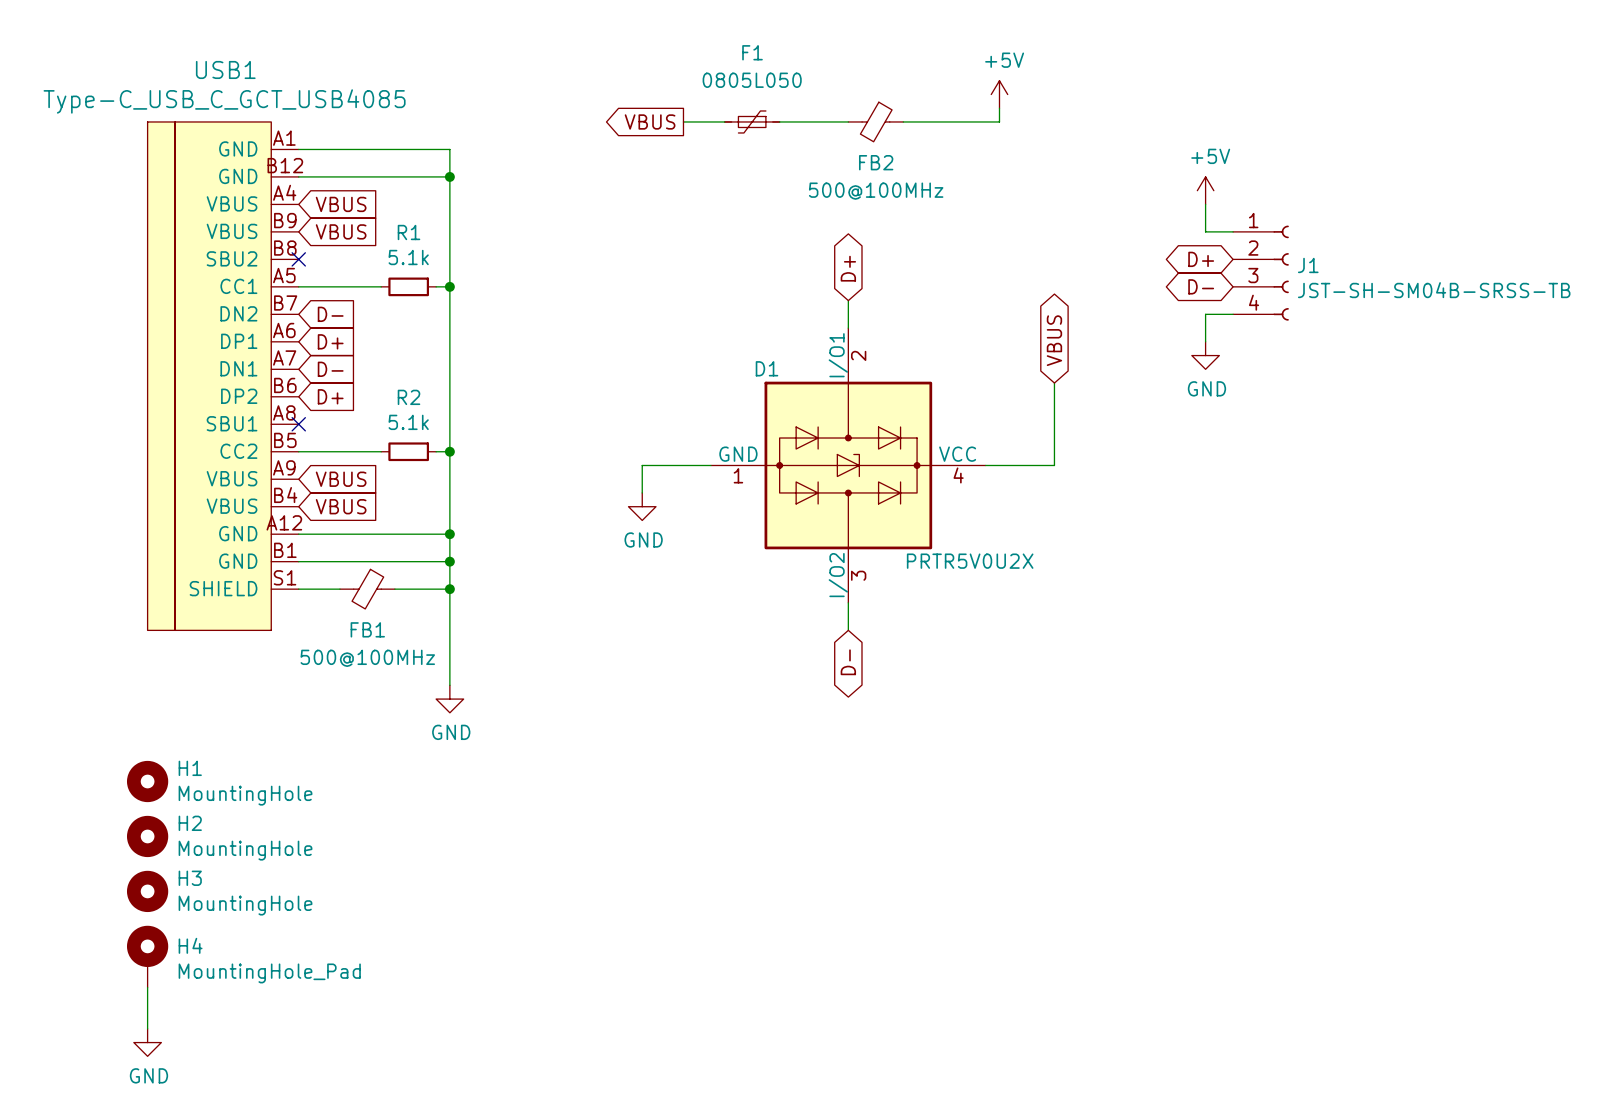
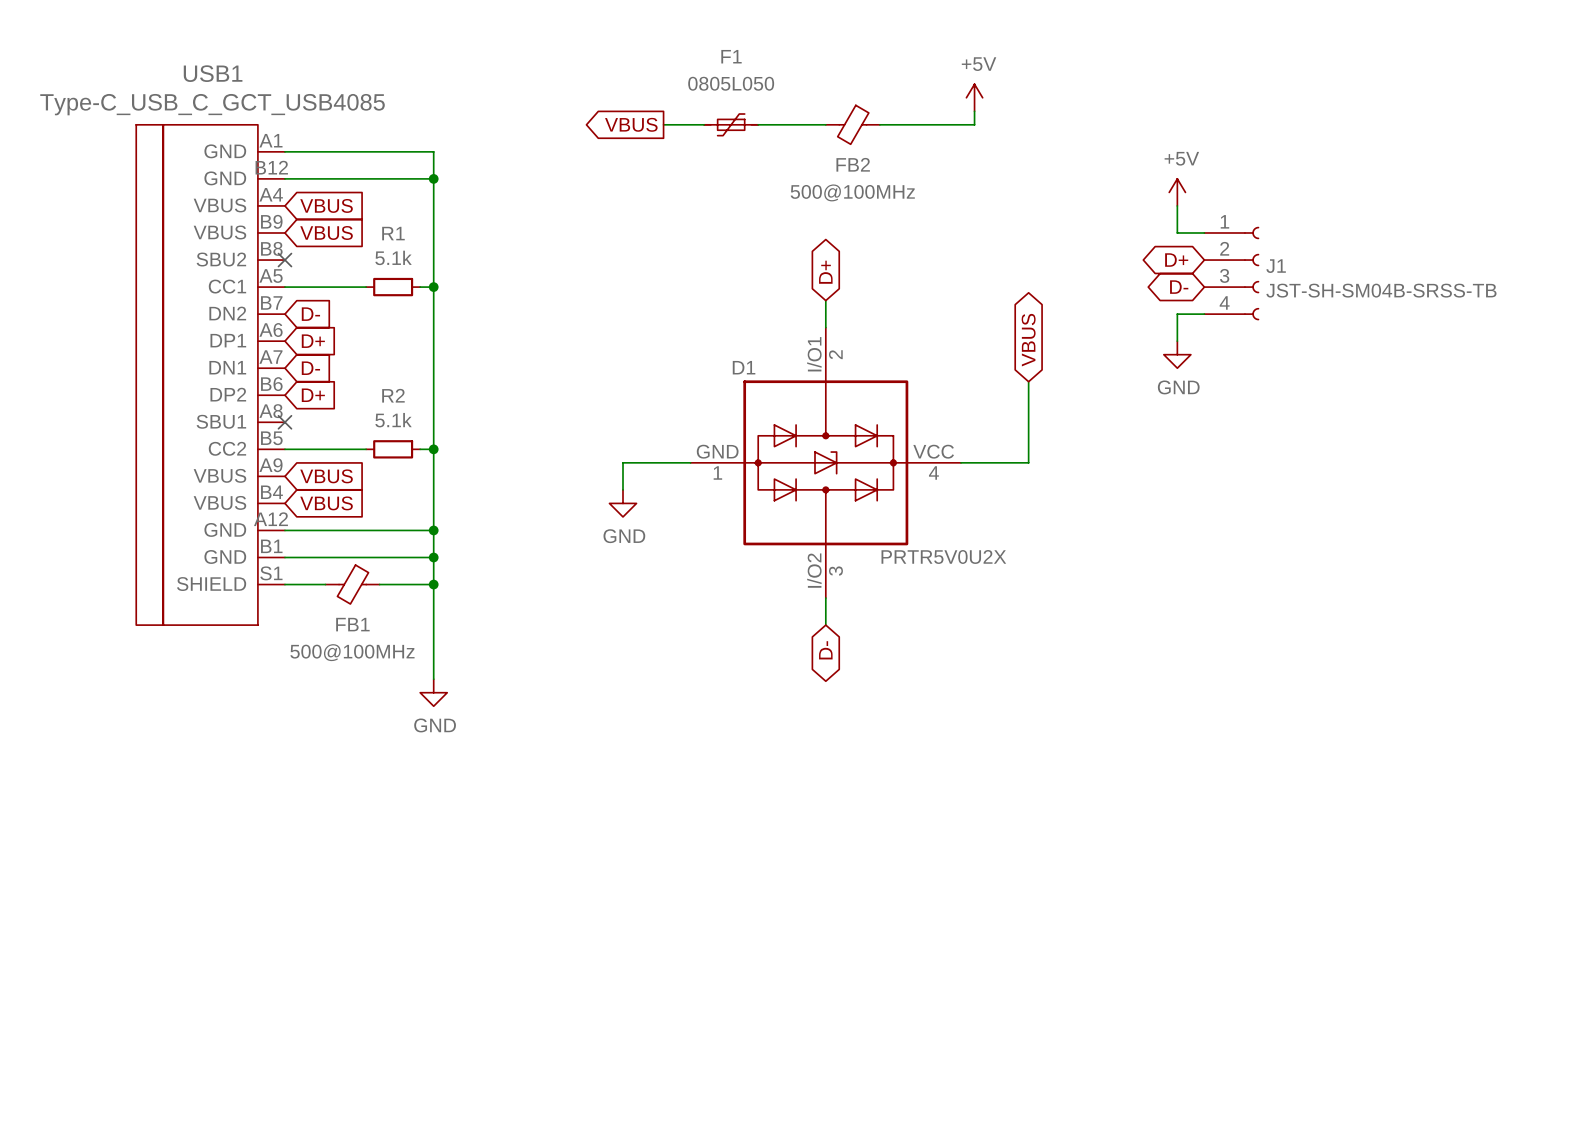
H1: MountingHole (147, 781) -> none
H2: MountingHole (147, 836) -> none
H3: MountingHole (147, 891) -> none
H4: MountingHole_Pad (147, 956) -> none
wire: (147, 987) (147, 1028) -> none
power symbol: GND (147, 1042) -> none

